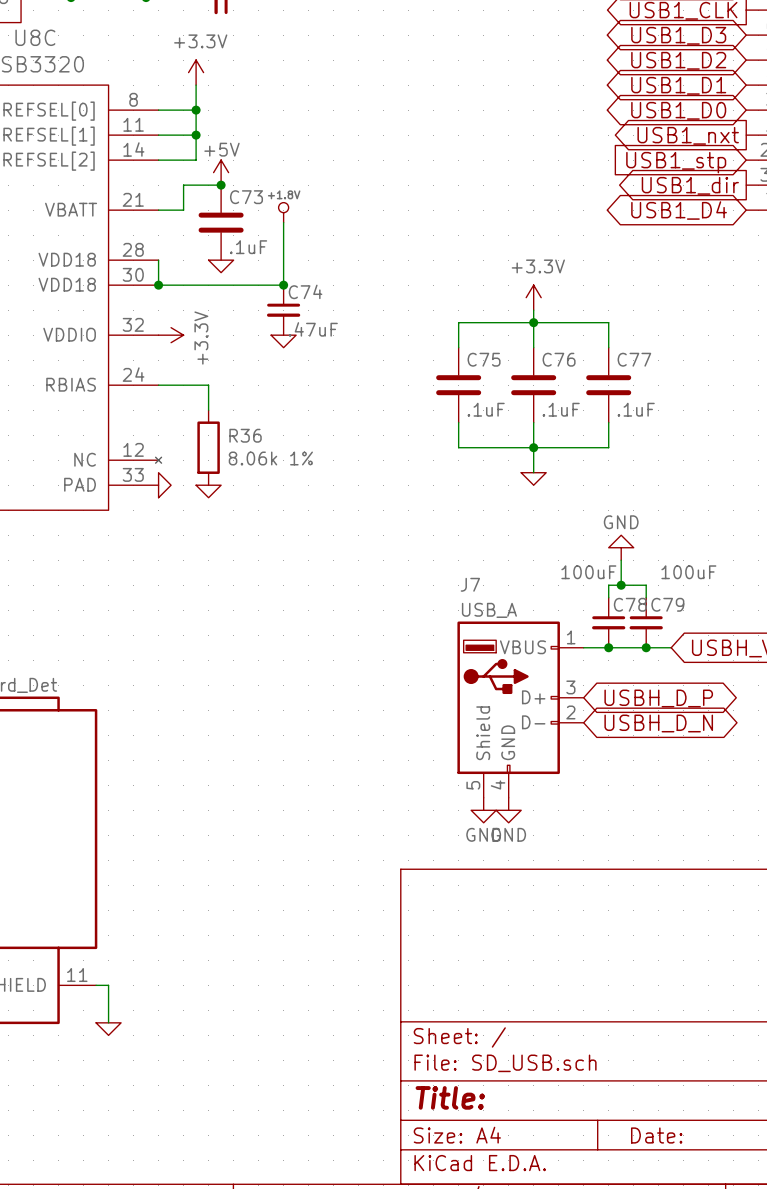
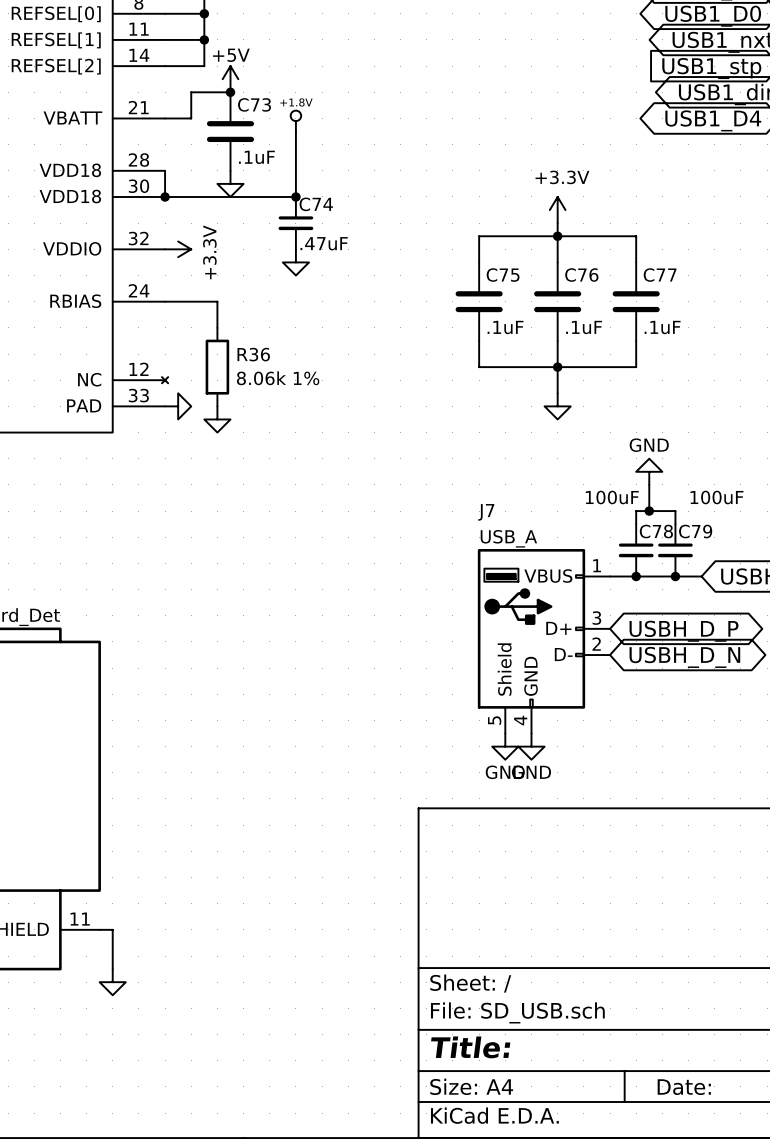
power symbol shape: [208, 260, 234, 273] -> [217, 170, 244, 197]
power symbol shape: [271, 335, 297, 348] -> [282, 249, 310, 276]
power symbol shape: [158, 472, 172, 498] -> [165, 393, 192, 420]
power symbol shape: [521, 472, 547, 486] -> [544, 393, 571, 420]
power symbol shape: [196, 485, 222, 498] -> [204, 406, 231, 433]
power symbol shape: [96, 1022, 122, 1036] -> [99, 969, 126, 996]

